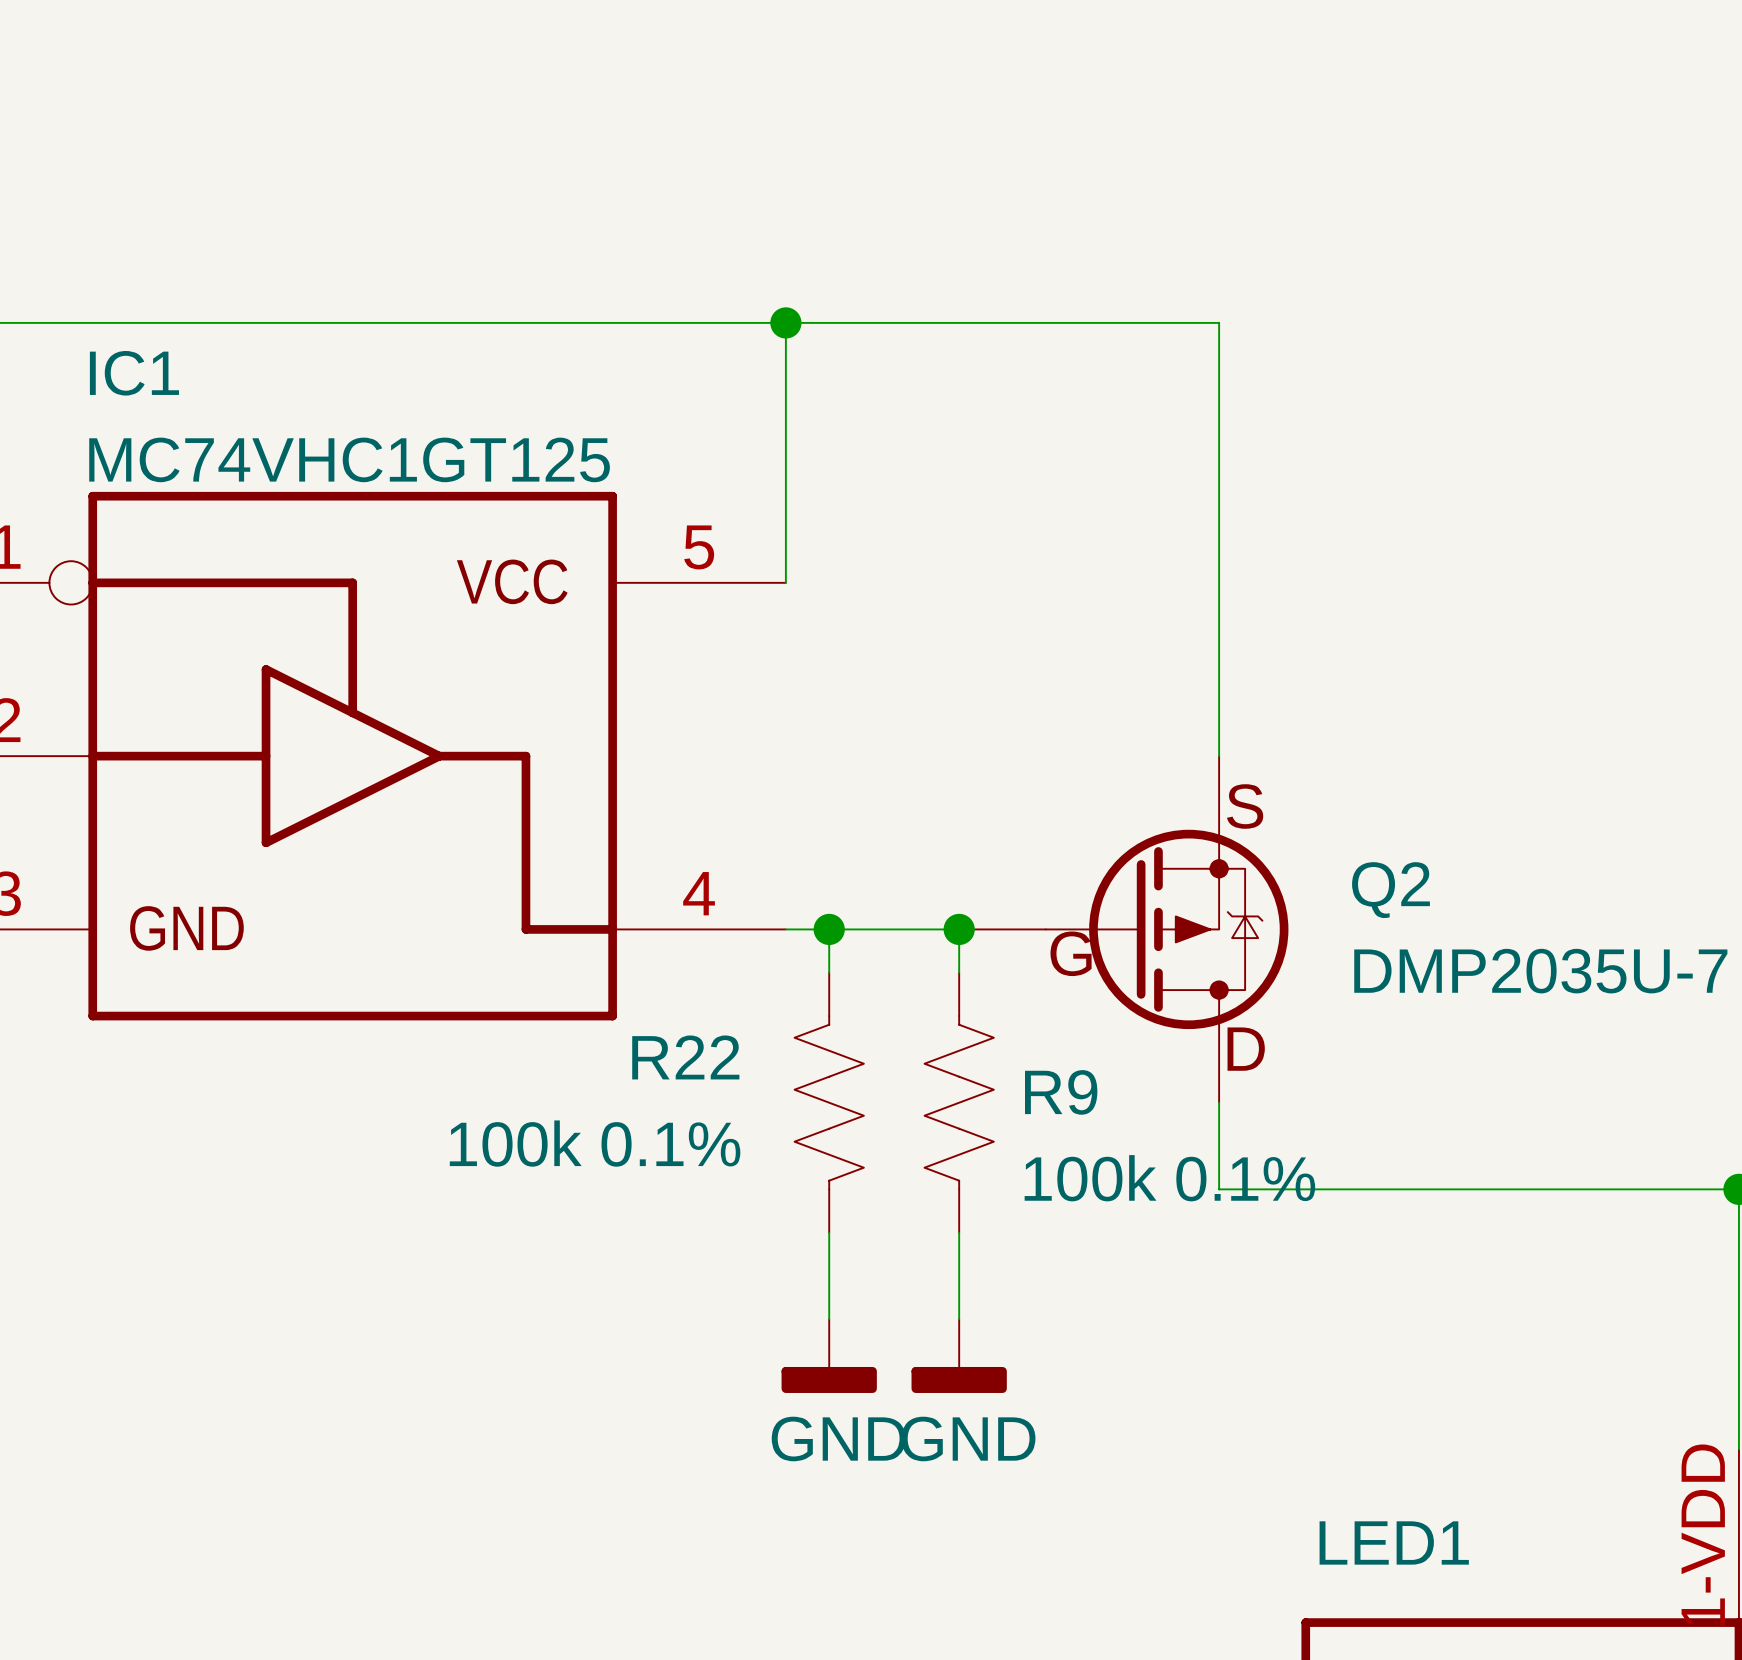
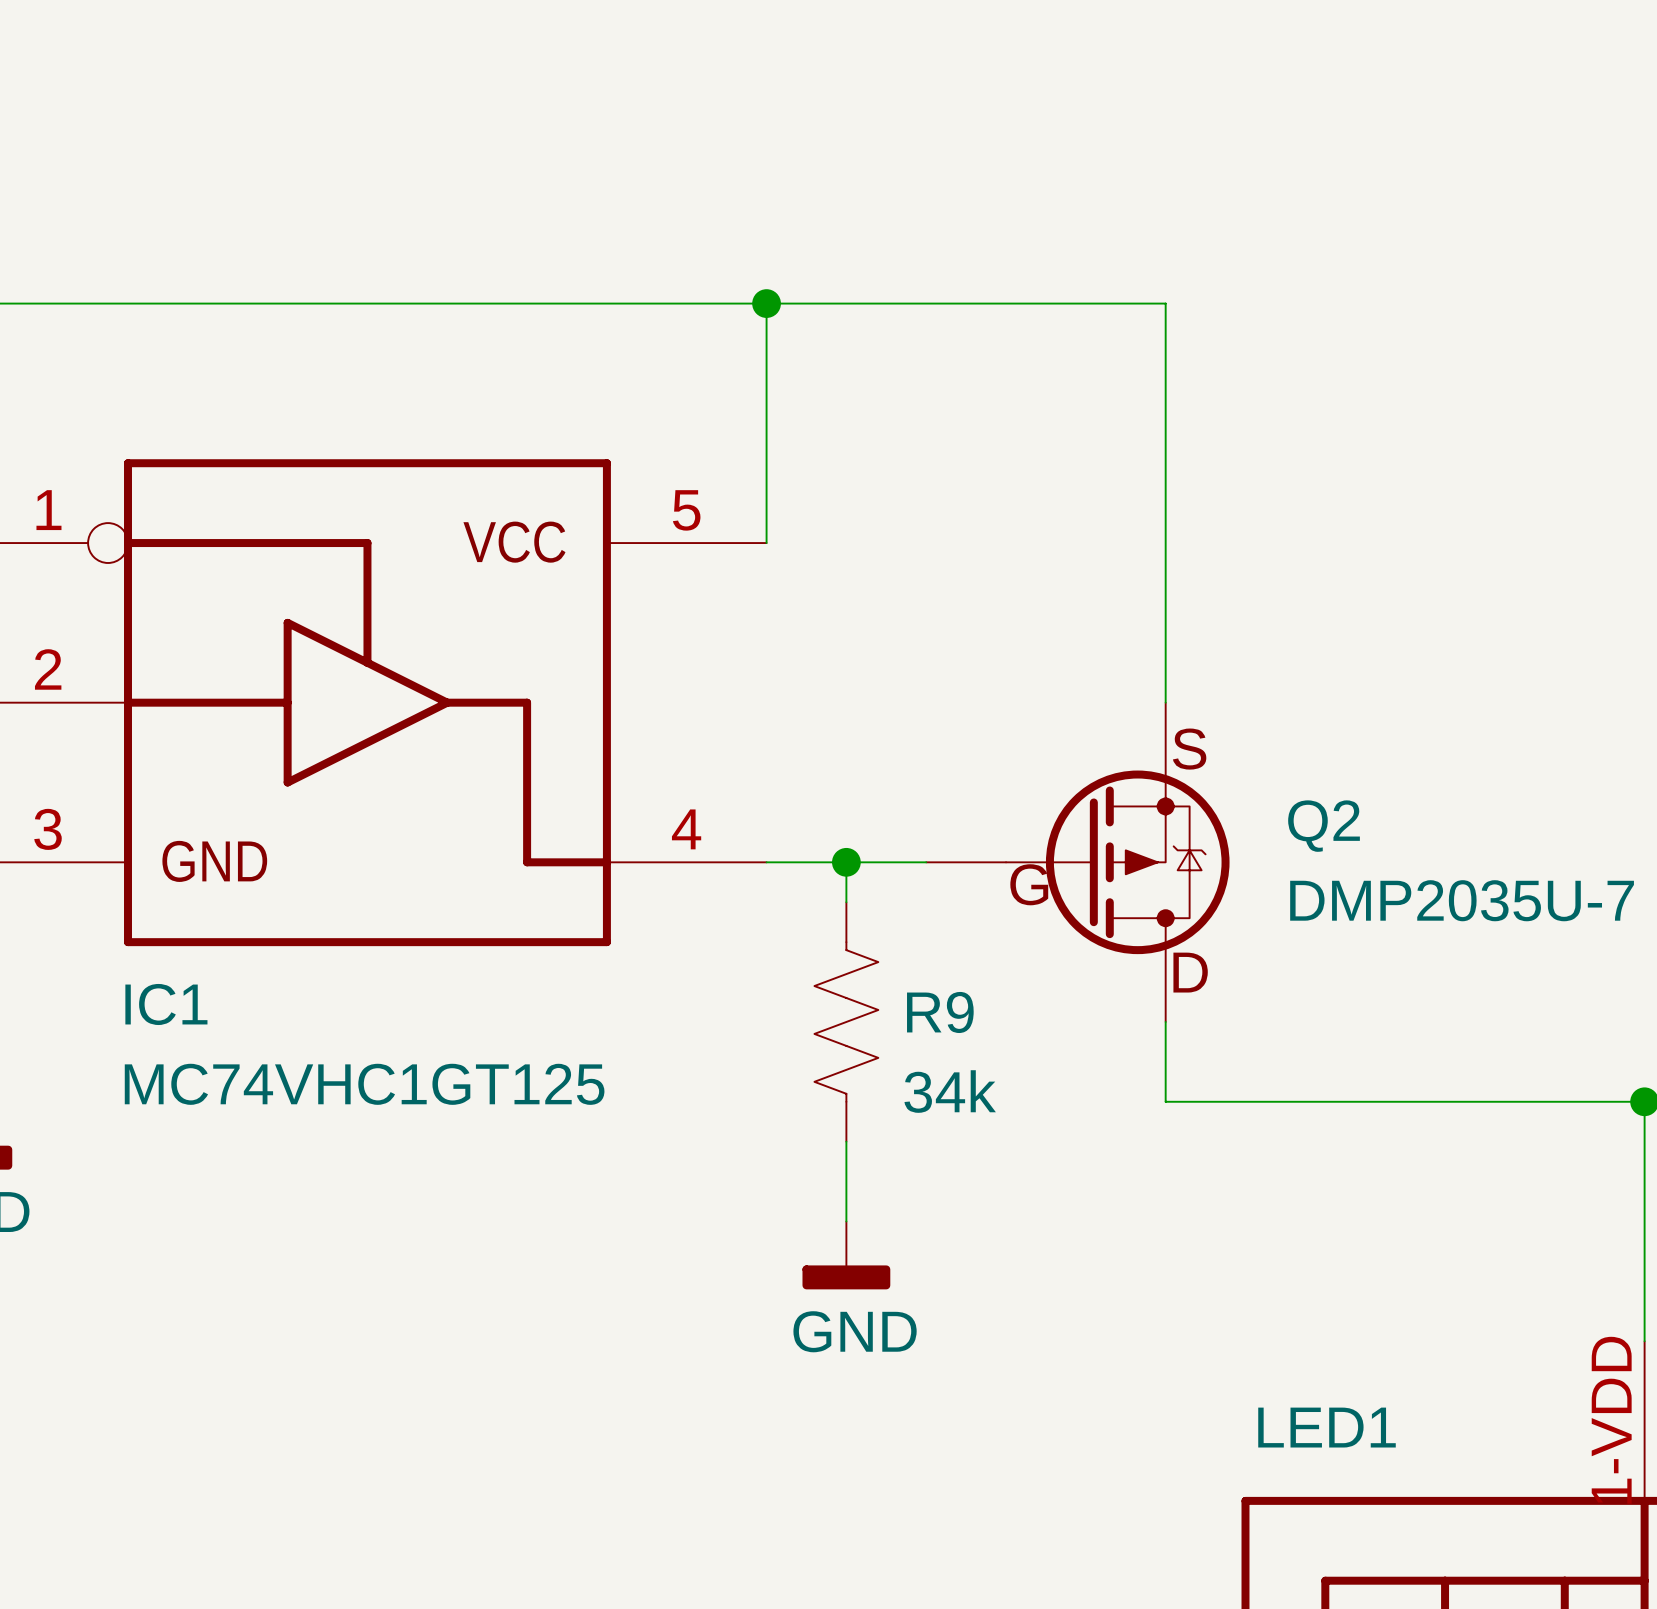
IC1 name position: IC1 (134, 373) -> IC1 (166, 1004)
IC1 value position: MC74VHC1GT125 (349, 459) -> MC74VHC1GT125 (364, 1084)
wire: (829, 929) (829, 972) -> (846, 862) (846, 902)
junction: (829, 929) -> none
junction: none -> (846, 862)
wire: (959, 929) (959, 972) -> none
junction: (959, 929) -> none
R22: 100k 0.1% (829, 1102) -> none
R9 position: (959, 1102) -> (846, 1021)
R9 value: 100k 0.1% (1169, 1178) -> 34k (950, 1091)
wire: (829, 1232) (829, 1319) -> (846, 1141) (846, 1221)
wire: (959, 1232) (959, 1319) -> none
power symbol: GND (829, 1356) -> none
power symbol: none -> GND (846, 1255)
power symbol: GND (959, 1356) -> none

